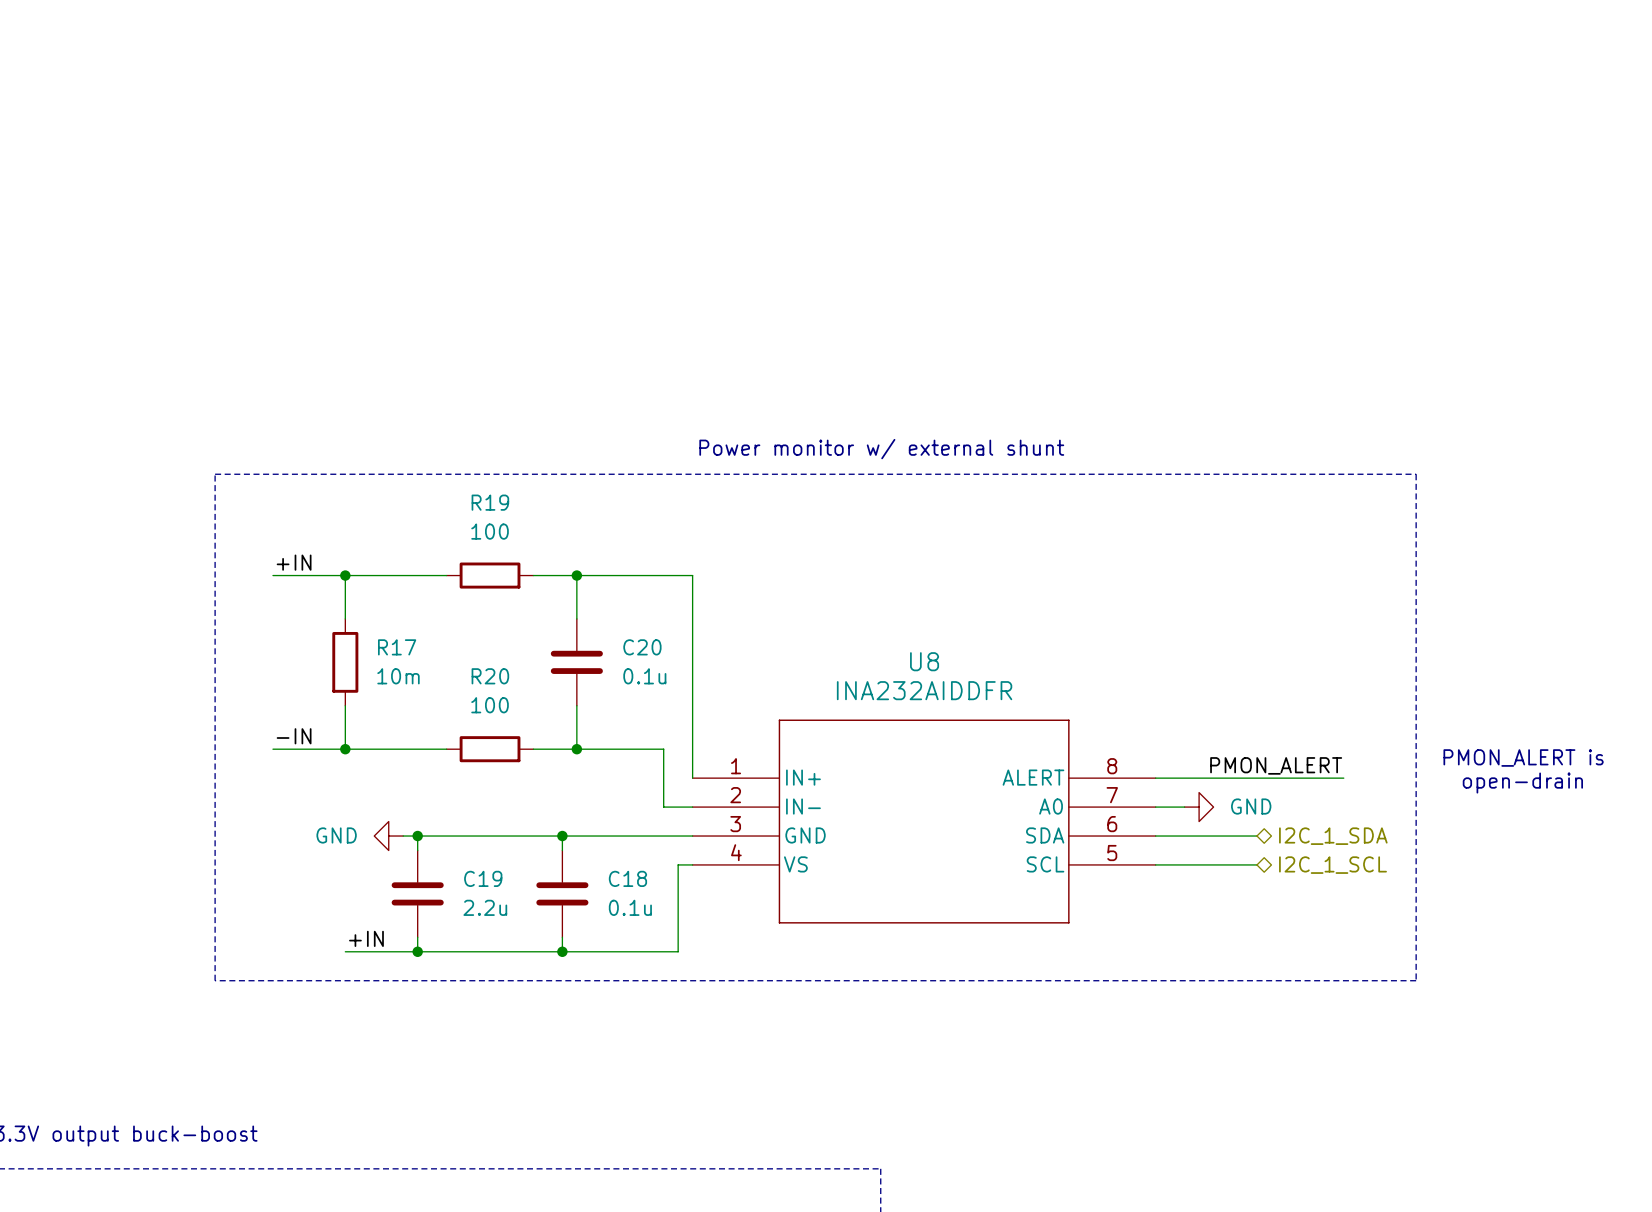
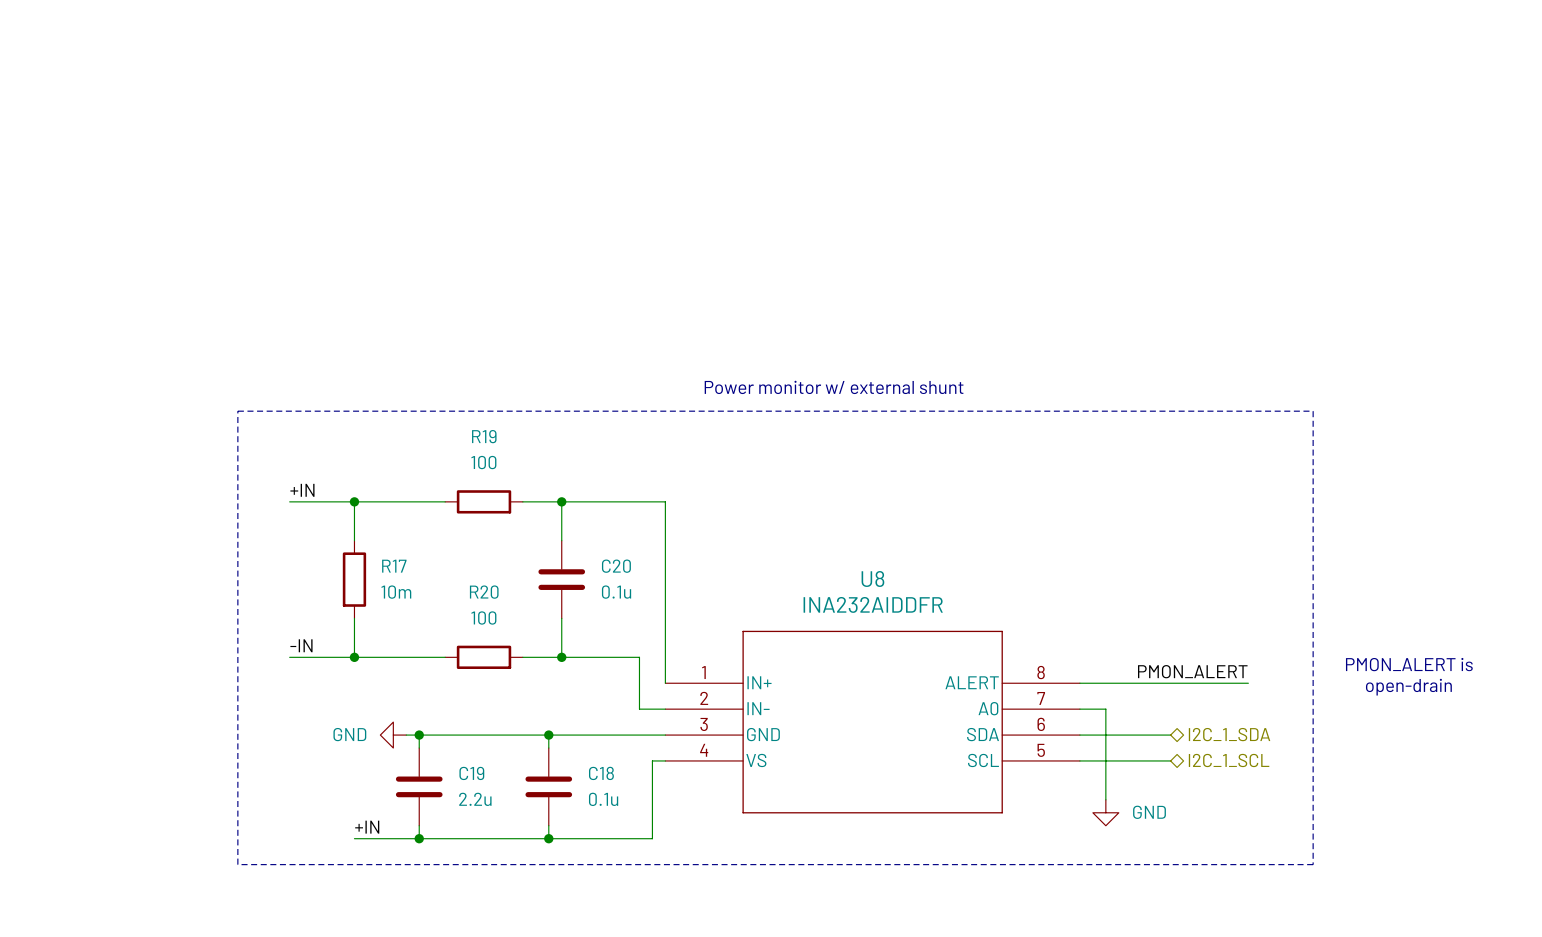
wire: none -> (1105, 709) (1105, 799)
power symbol rotation: 0° (1199, 807) -> 90° clockwise (1105, 812)
power symbol position: GND (1199, 807) -> GND (1105, 812)

